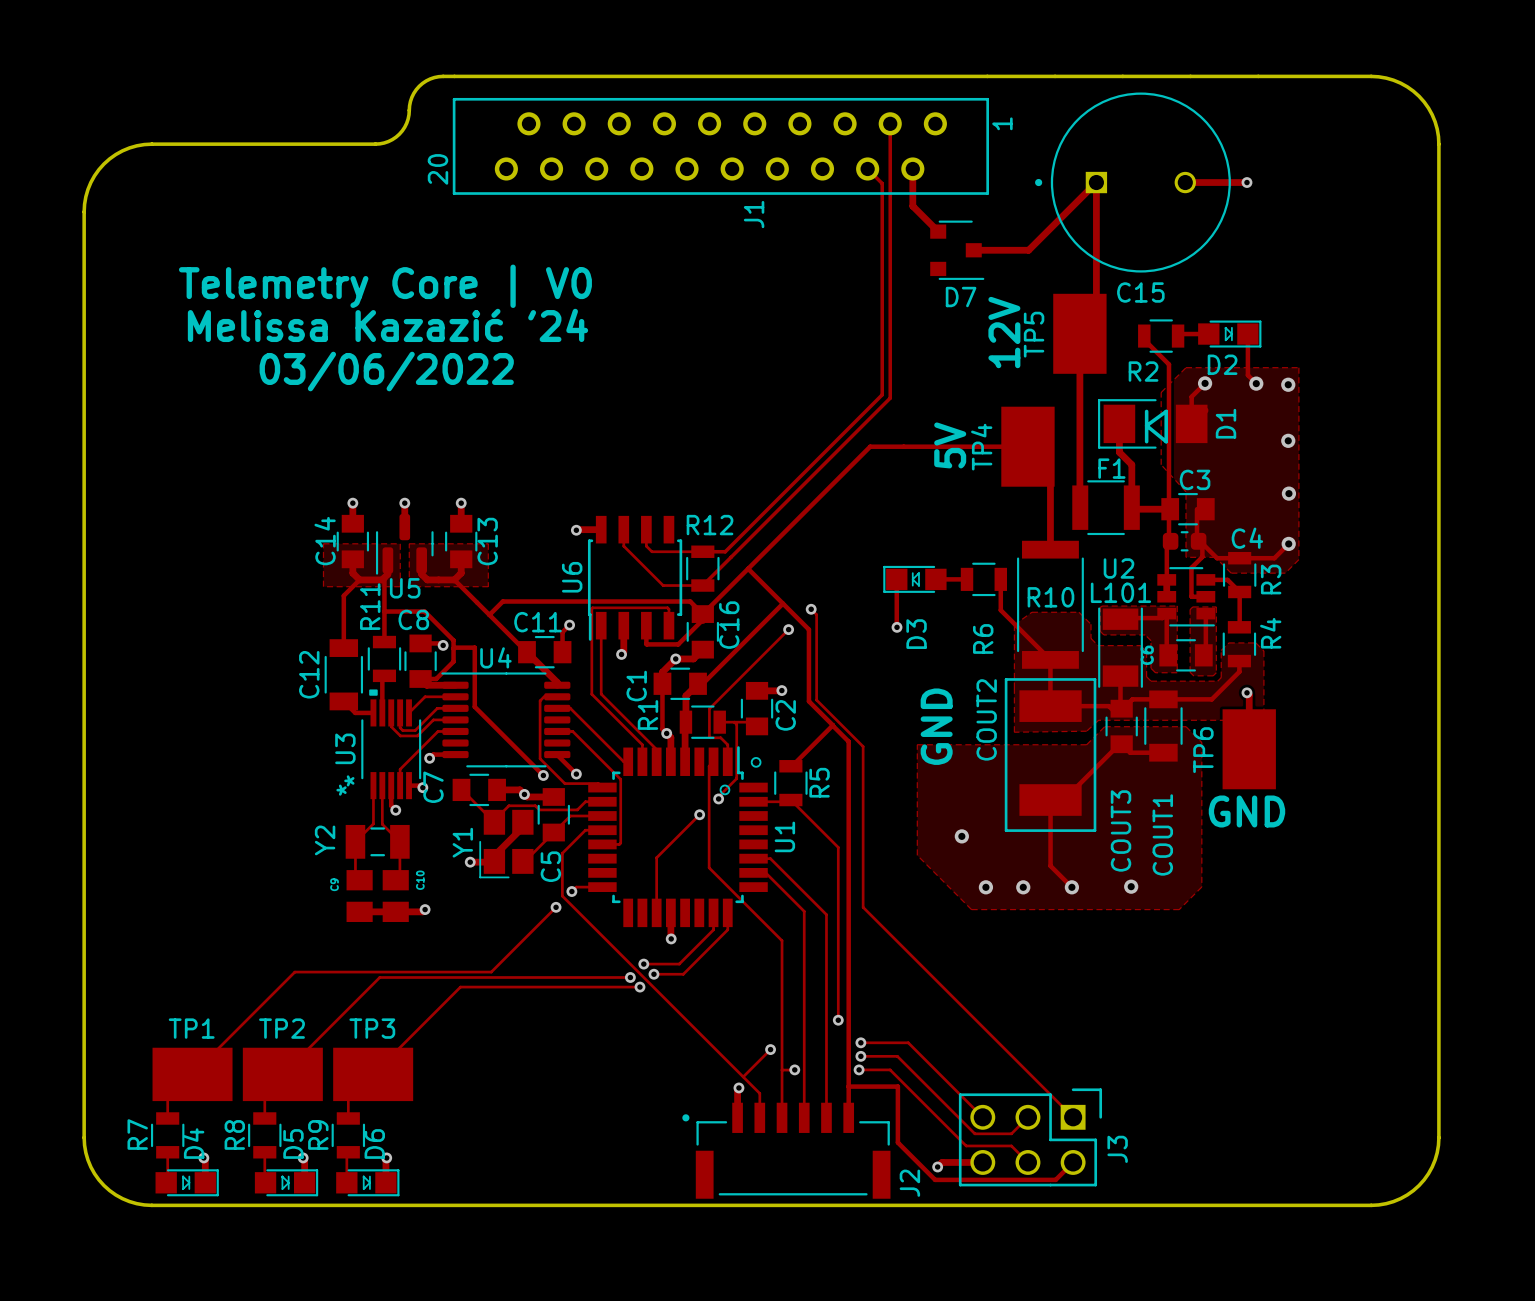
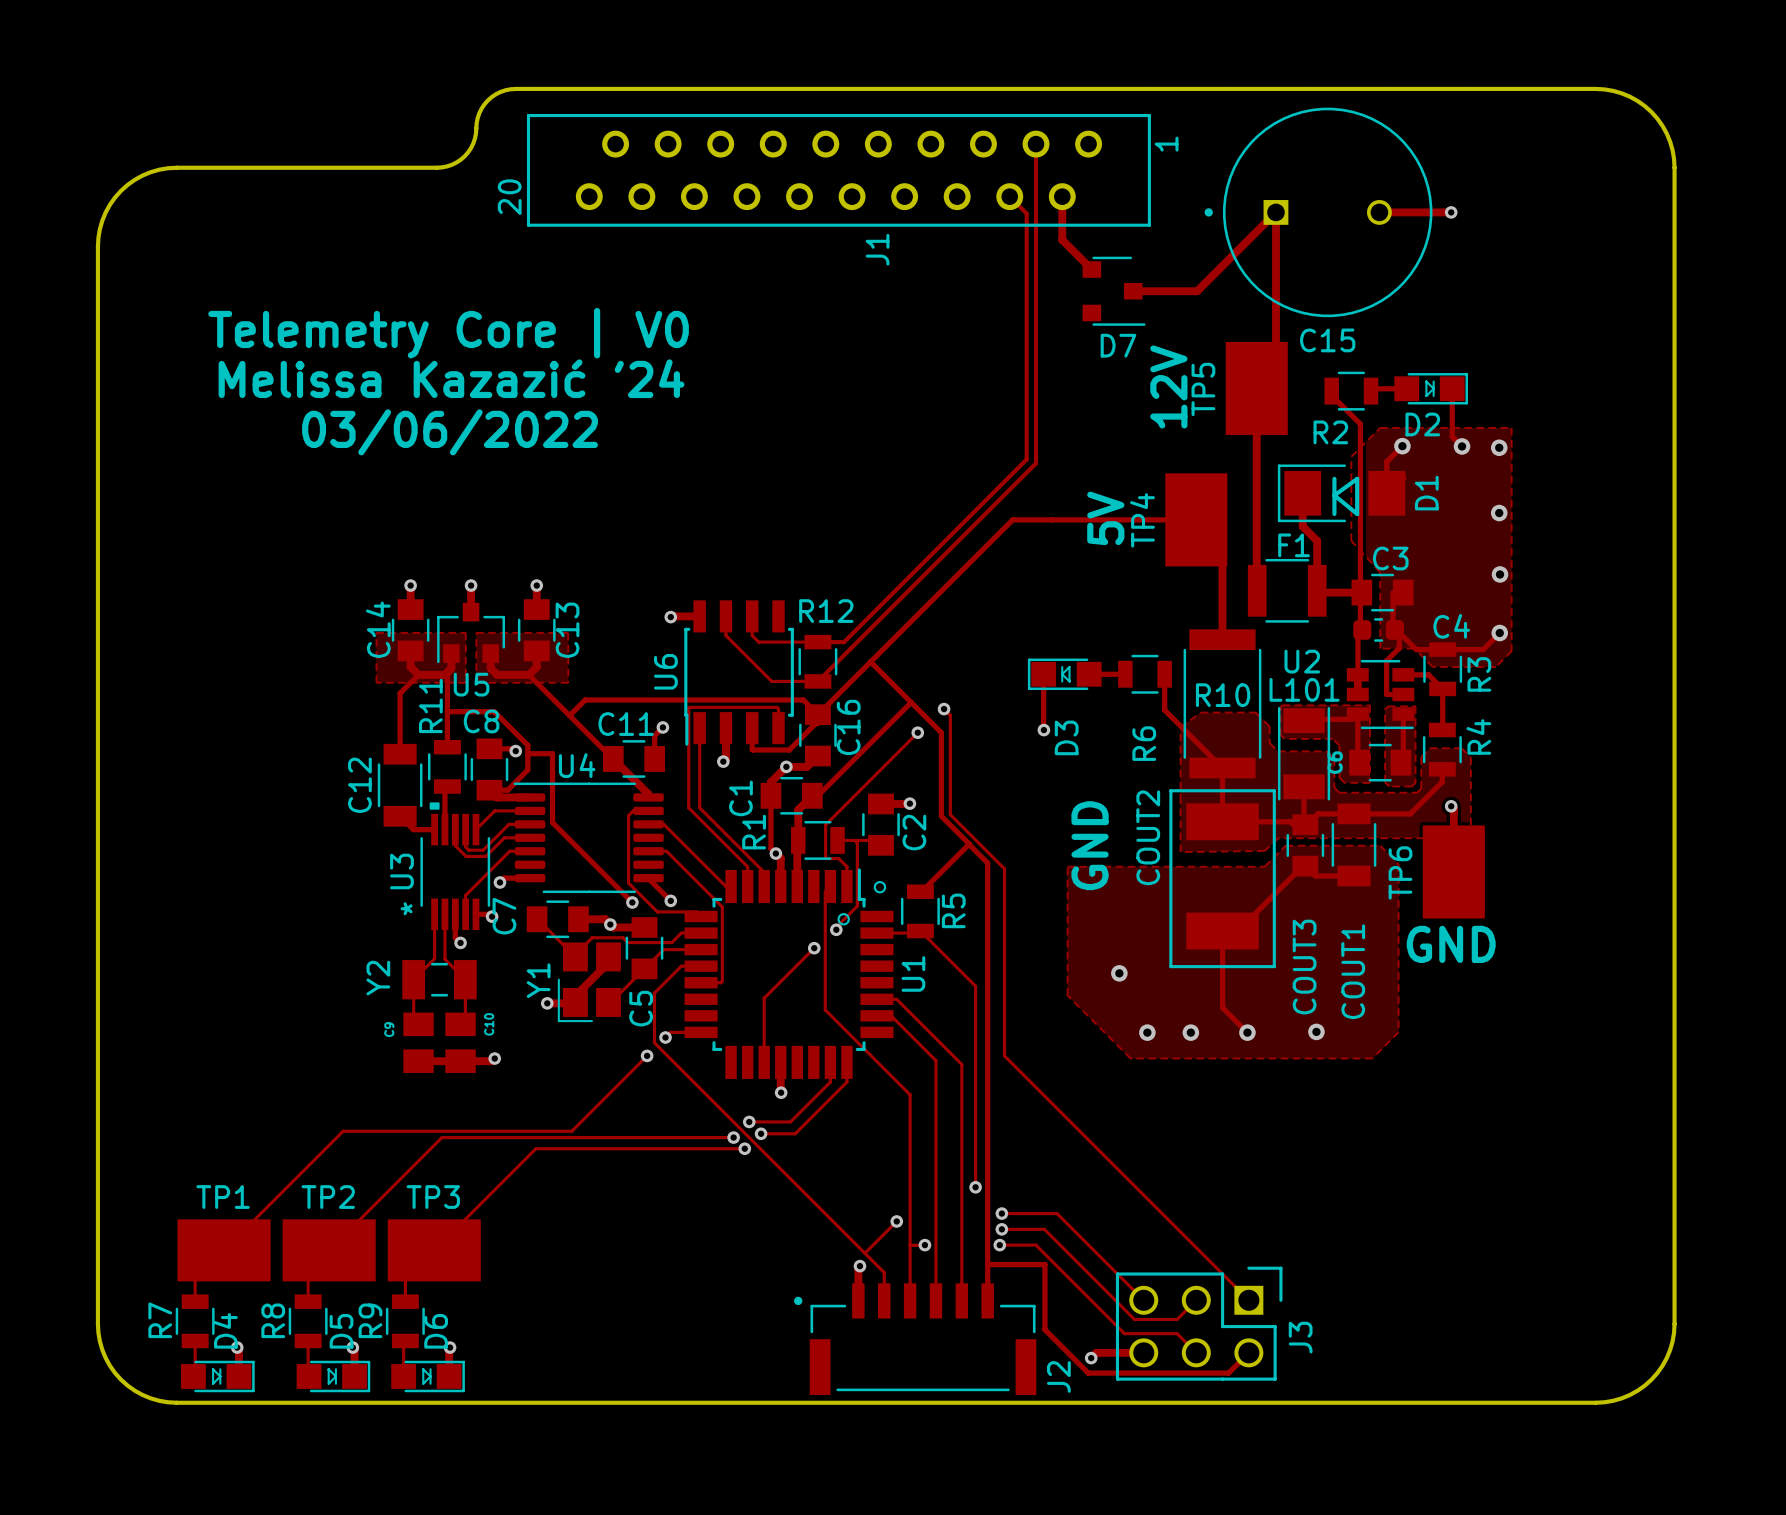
U5 footprint: [375, 514, 434, 575] -> [437, 602, 506, 664]
U3 text: * (341, 790) -> none

